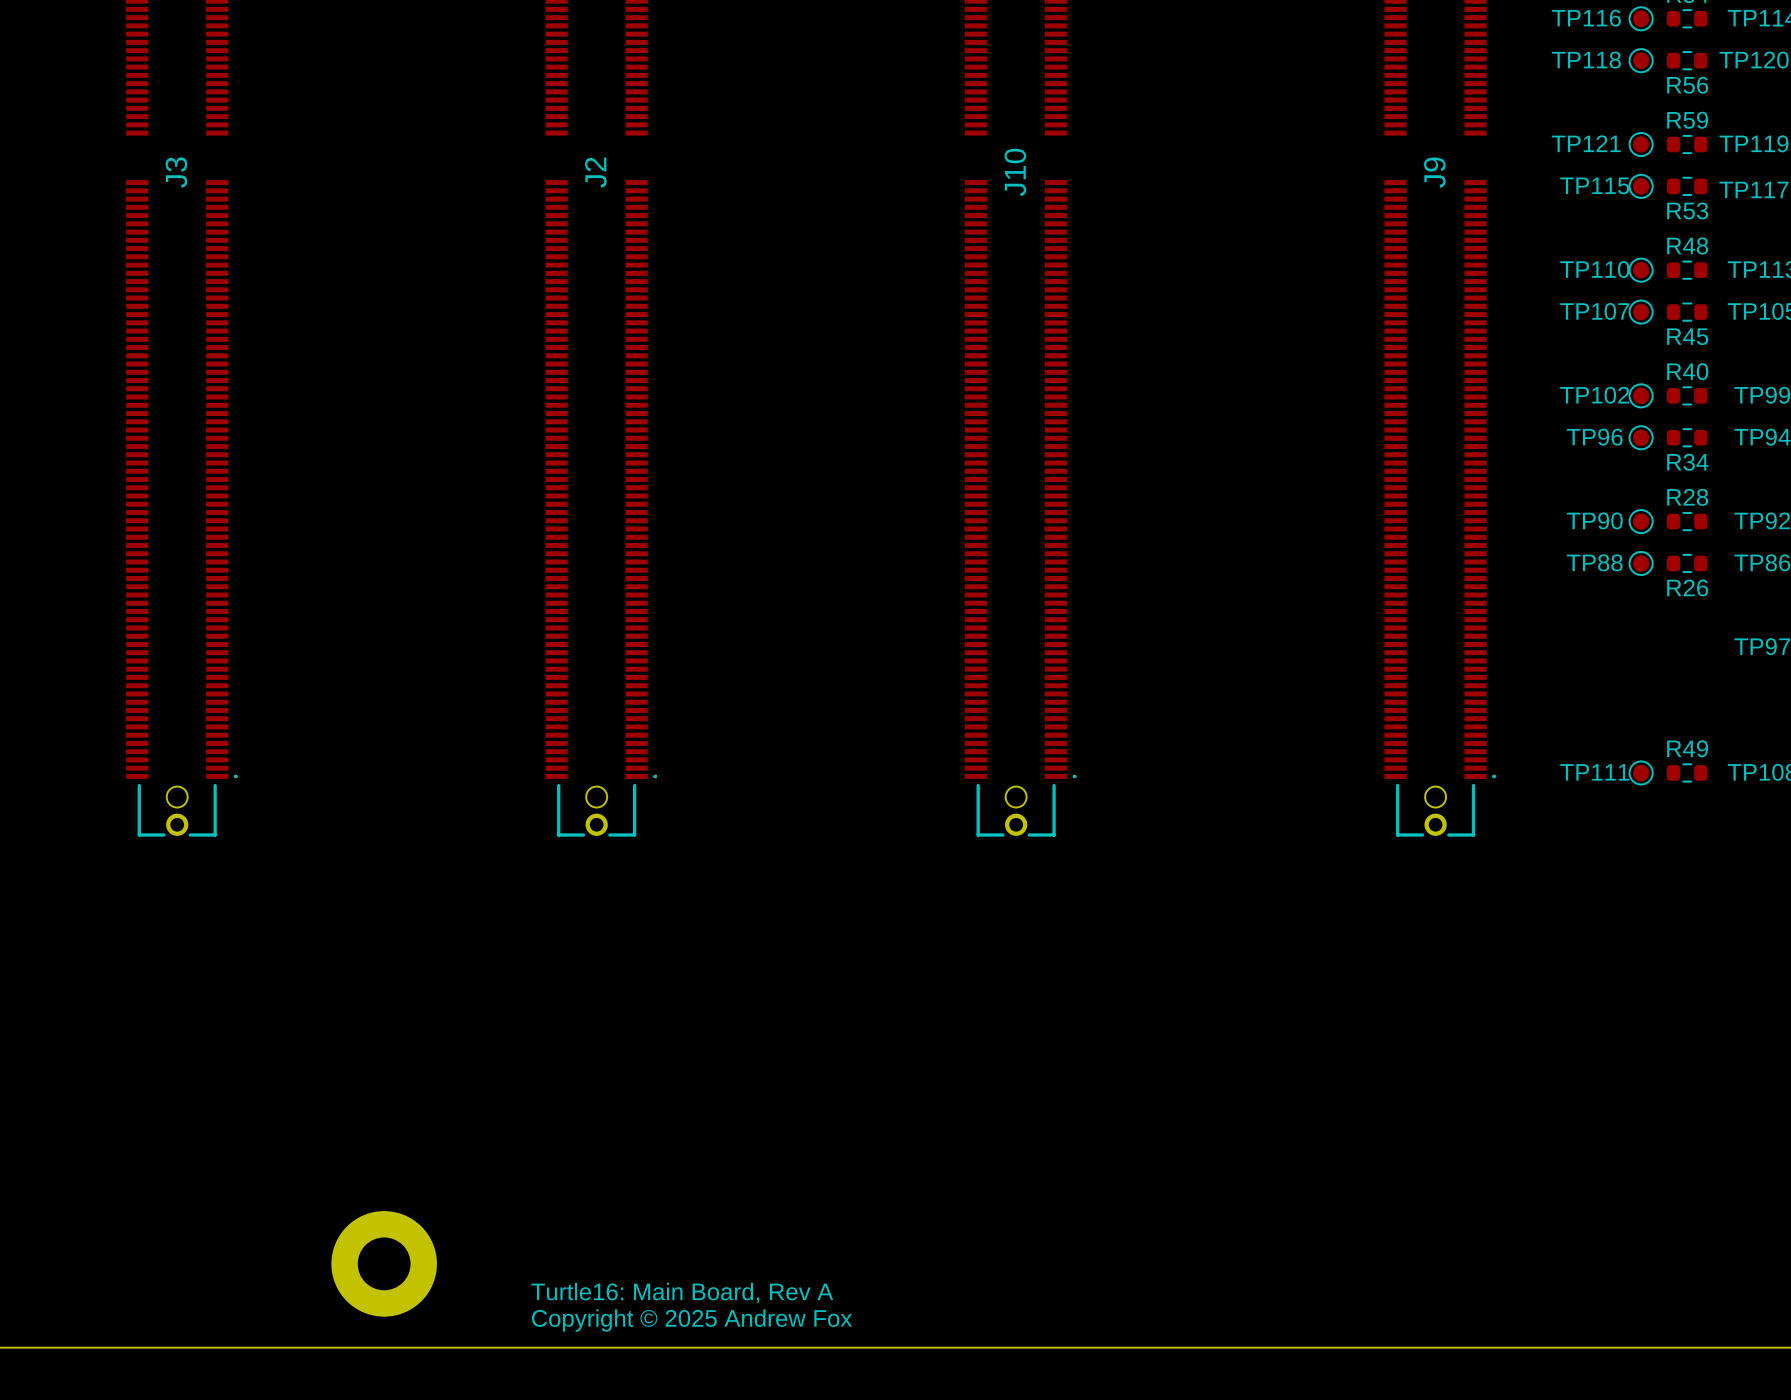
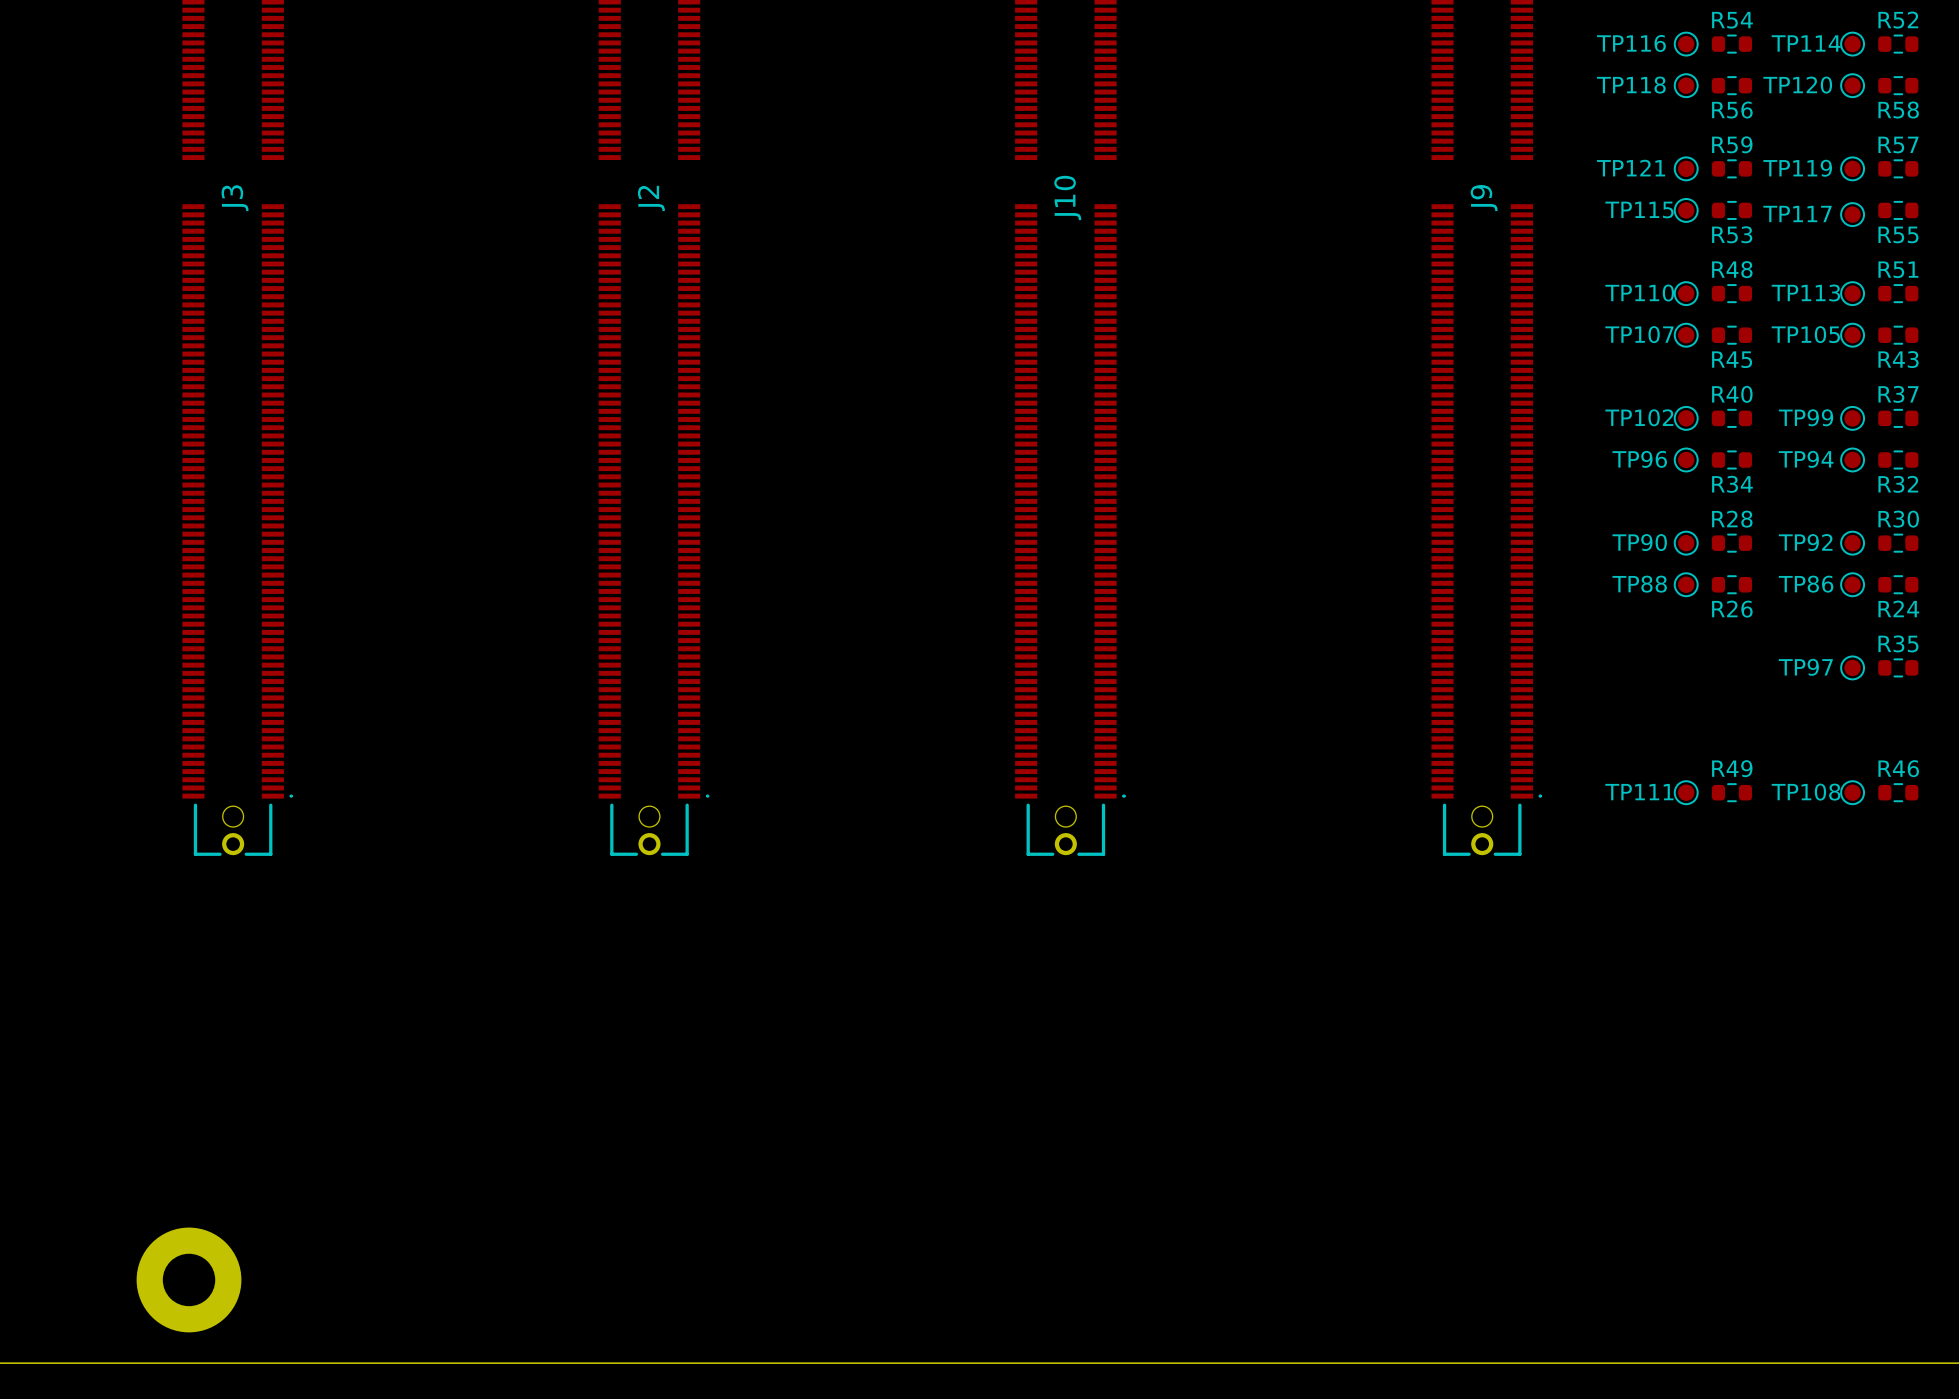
part position: (384, 1263) -> (189, 1279)
text: Turtle16: Main Board, Rev A (682, 1292) -> none
text: Copyright © 2025 Andrew Fox (692, 1320) -> none

